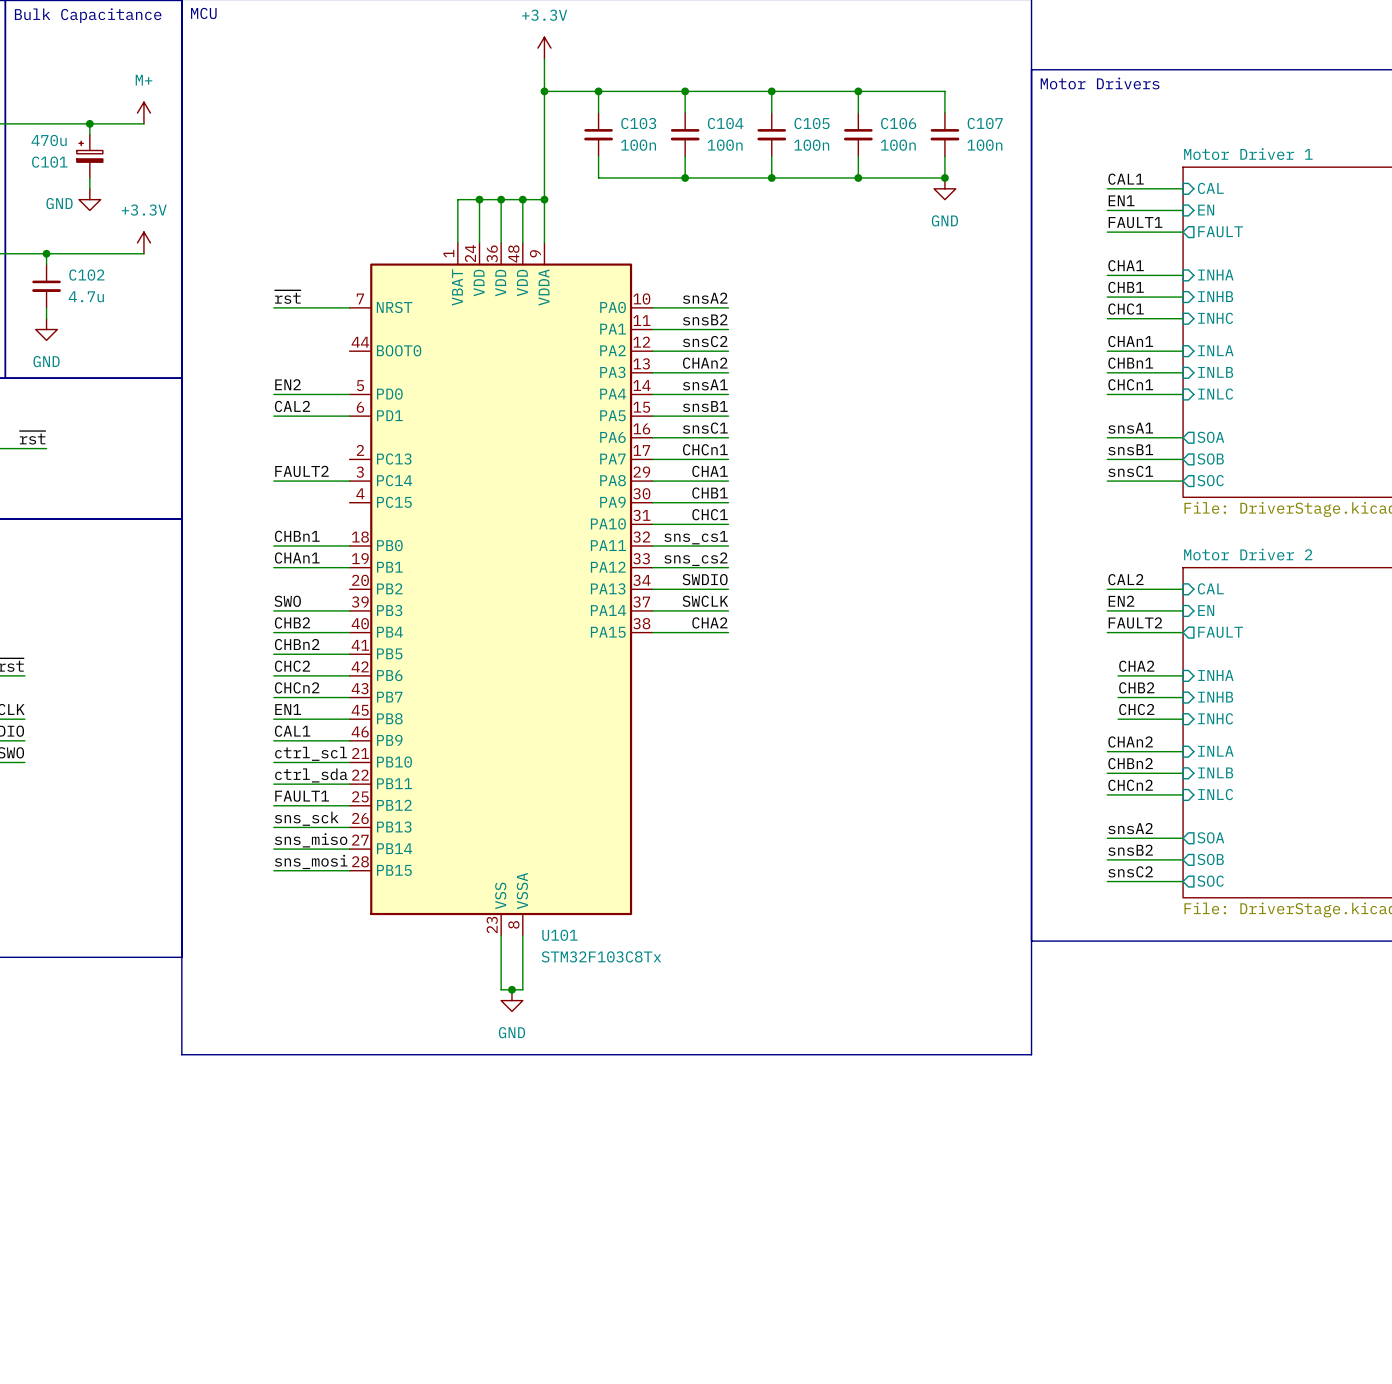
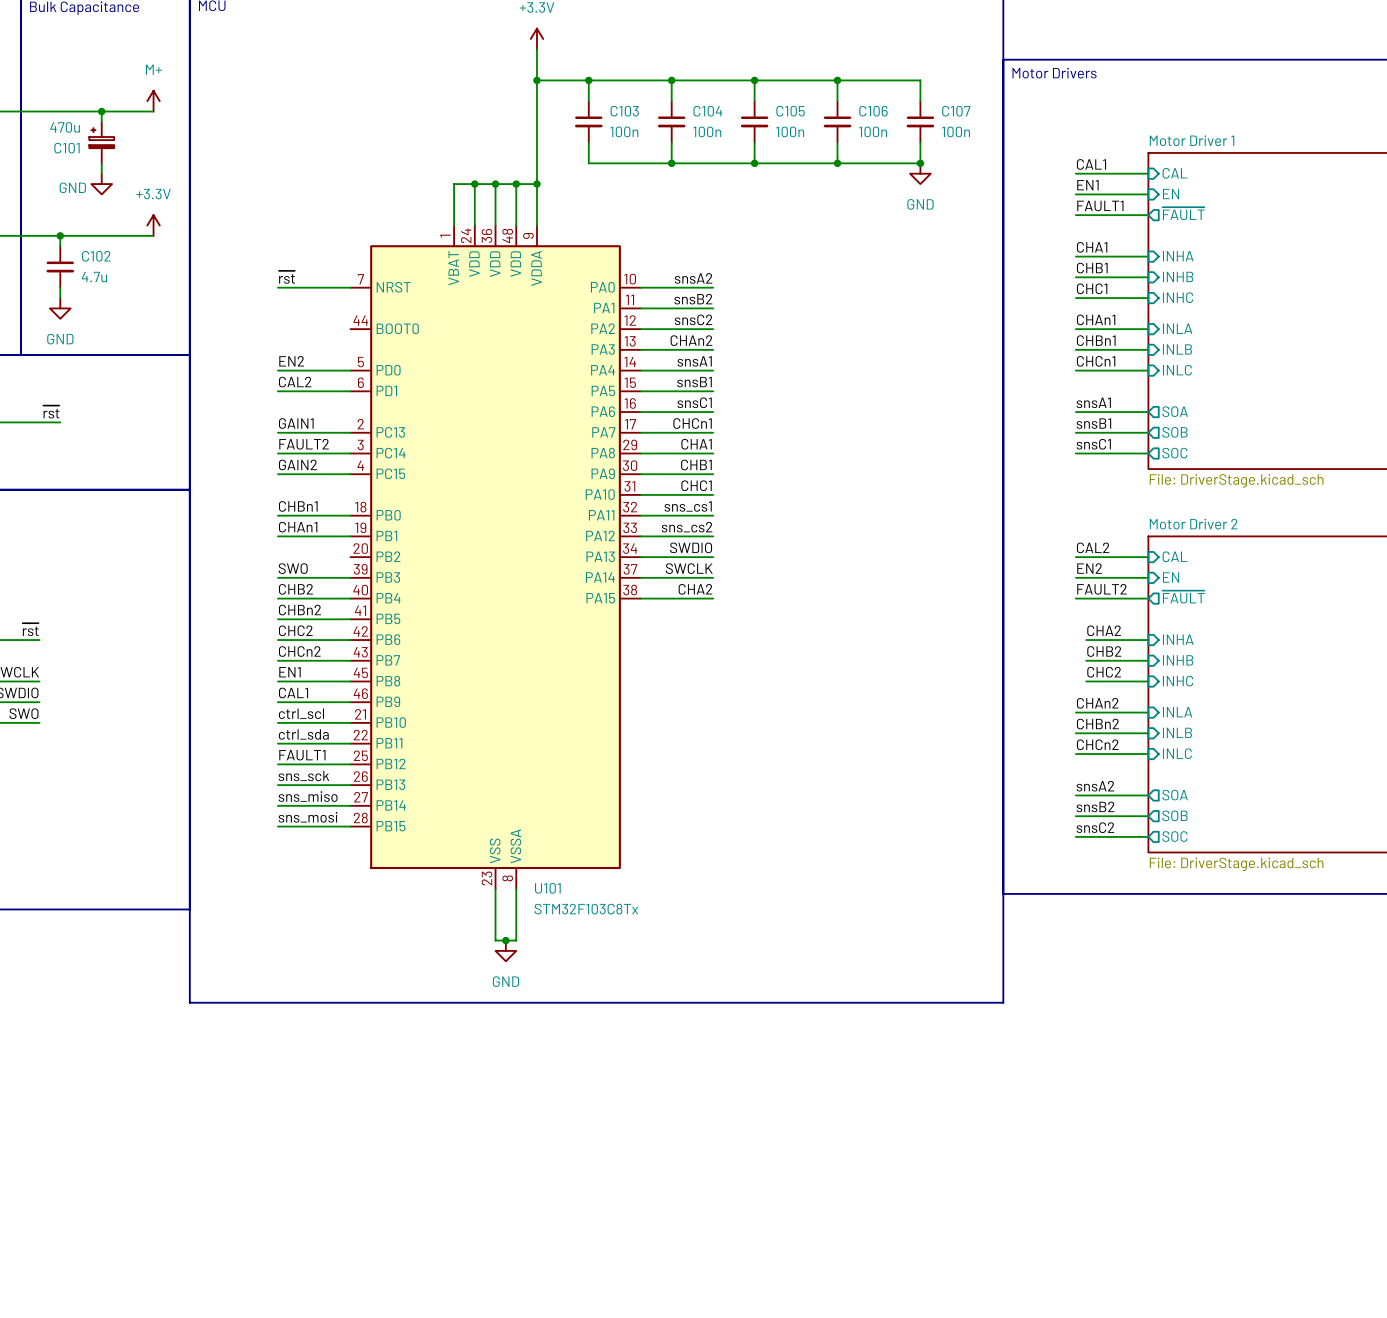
sheet pin: FAULT (1220, 231) -> ~{FAULT} (1183, 213)
label: none -> GAIN1 (296, 423)
wire: none -> (277, 432) (350, 432)
label: none -> GAIN2 (297, 464)
wire: none -> (277, 474) (350, 474)
sheet pin: FAULT (1220, 632) -> ~{FAULT} (1183, 597)

